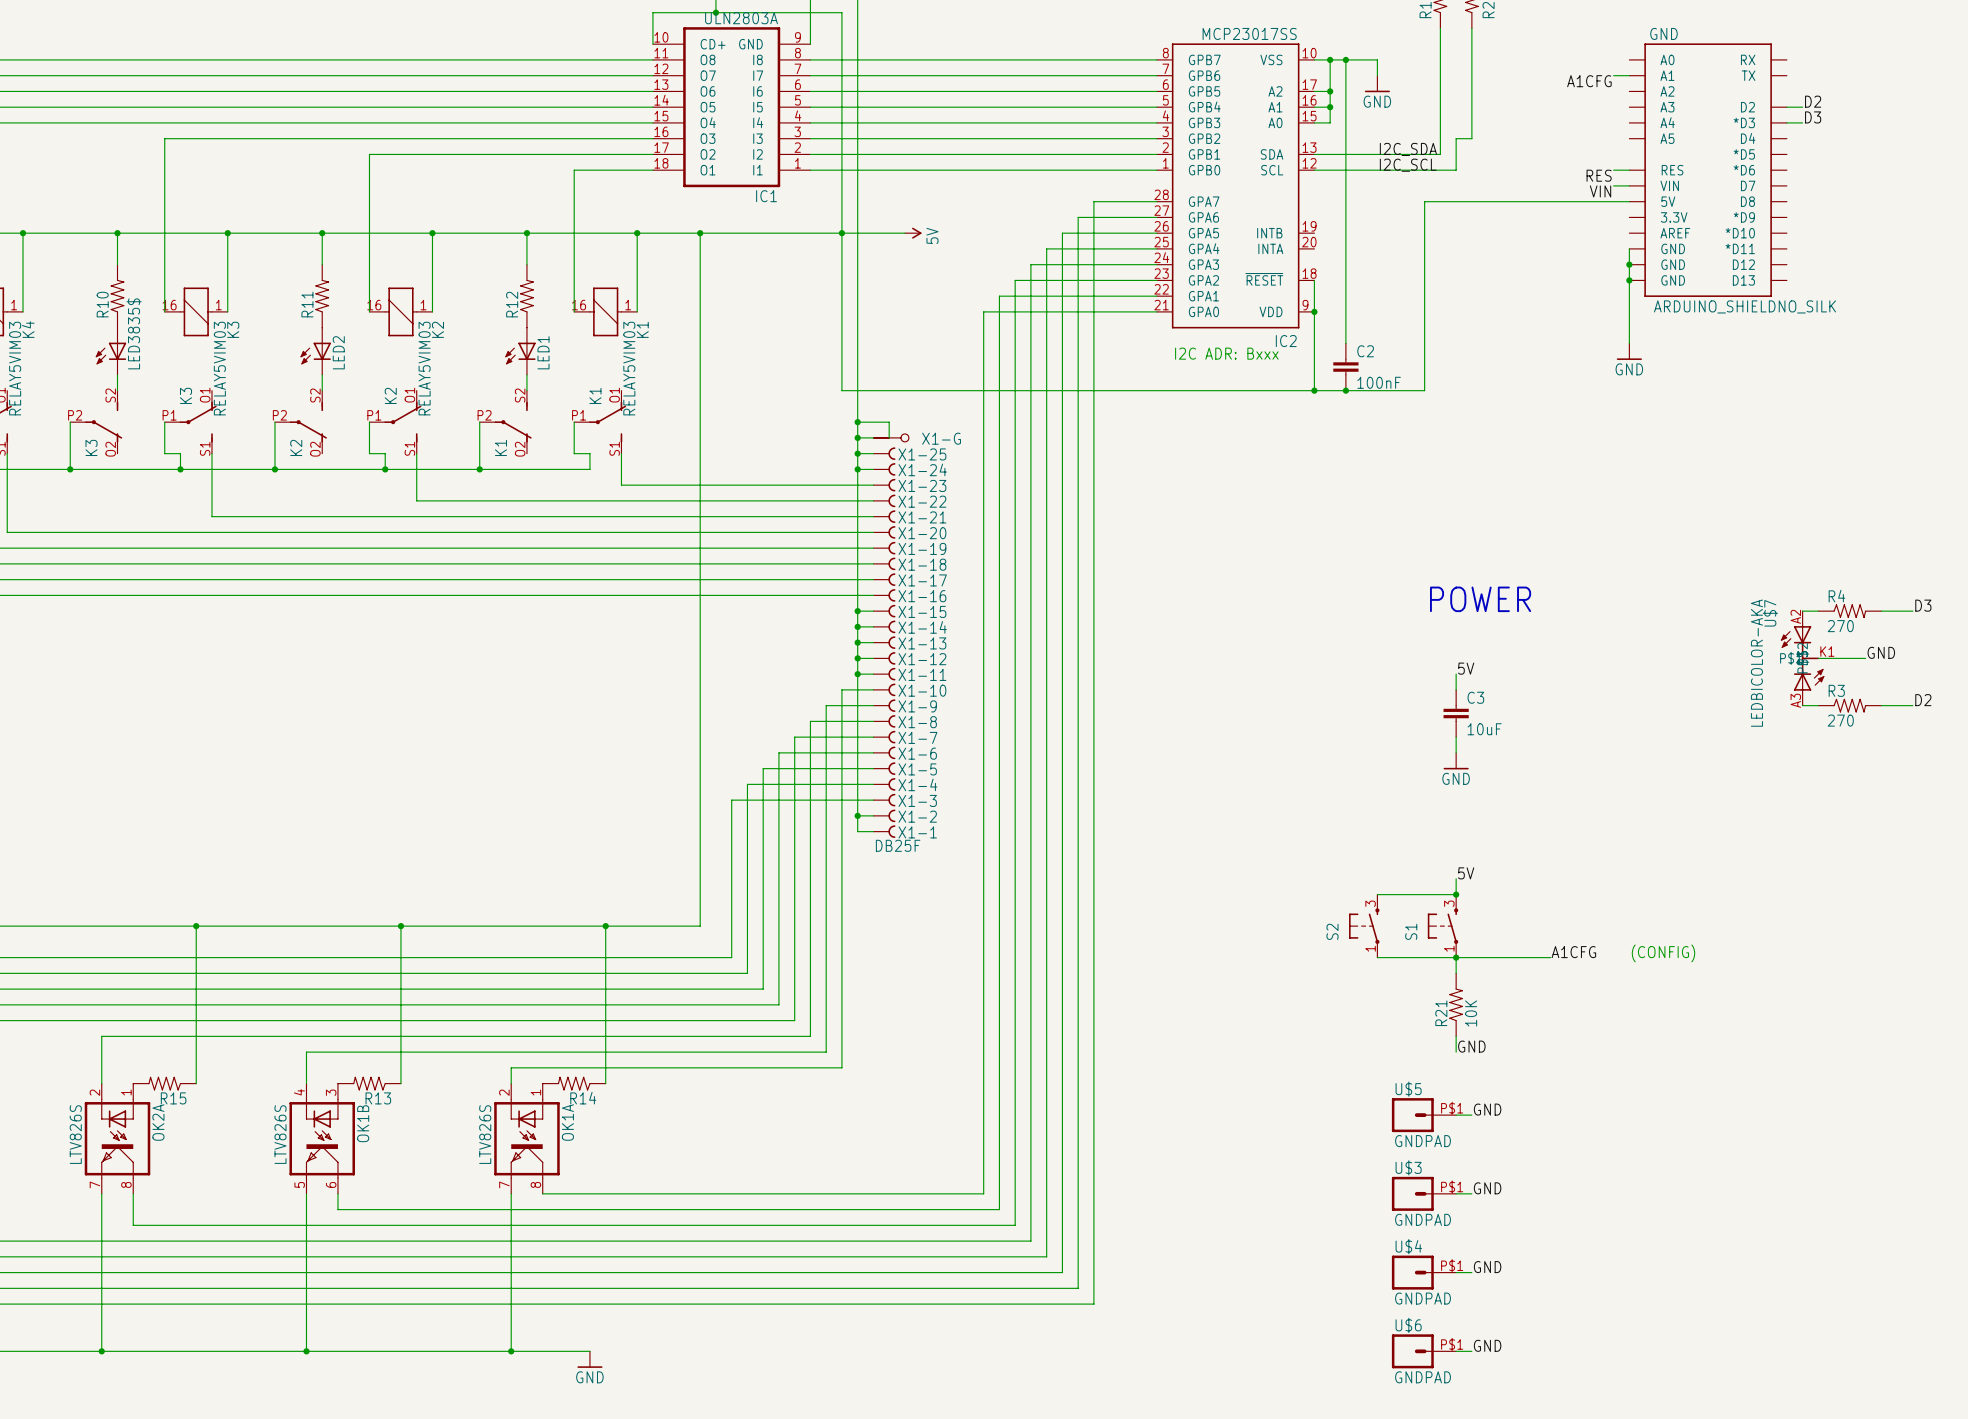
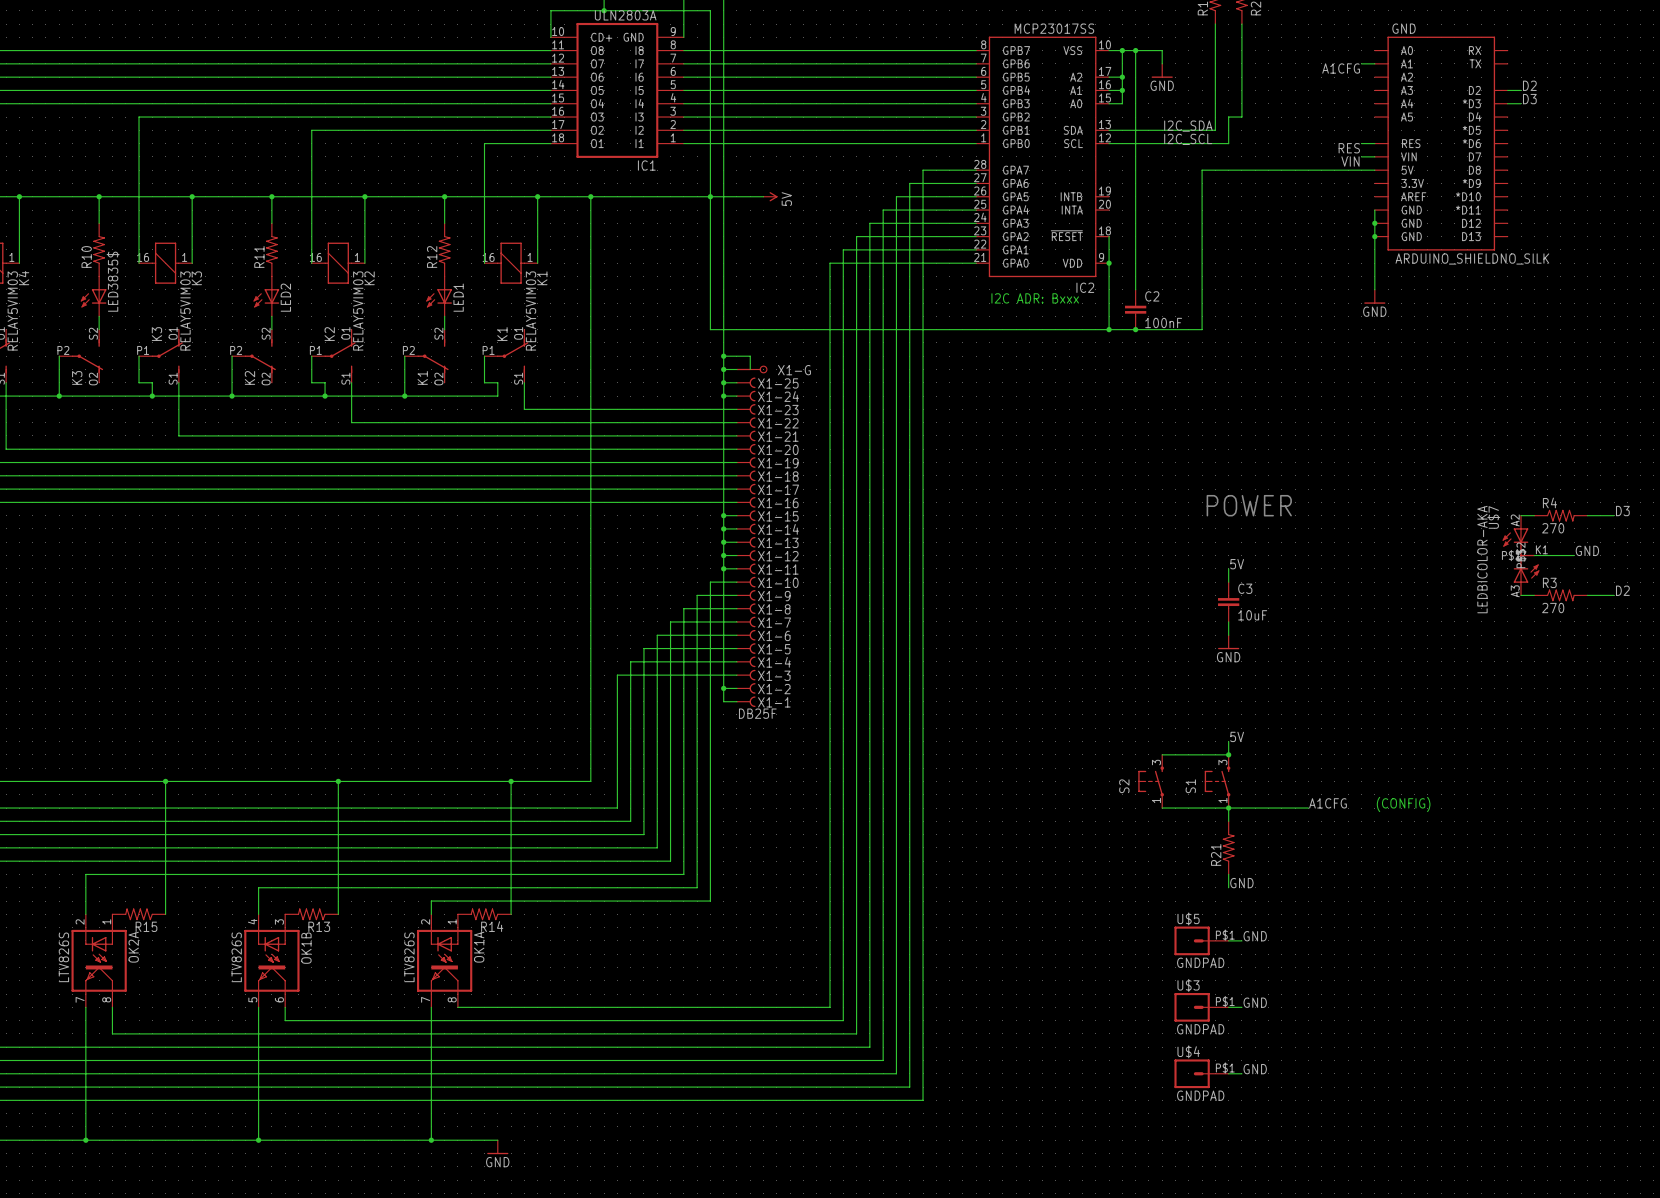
R21 value: 10K (1471, 1013) -> none
label: GND (1487, 1345) -> none
U$6: GNDPAD (1424, 1351) -> none
wire: (1456, 1351) (1471, 1351) -> none

